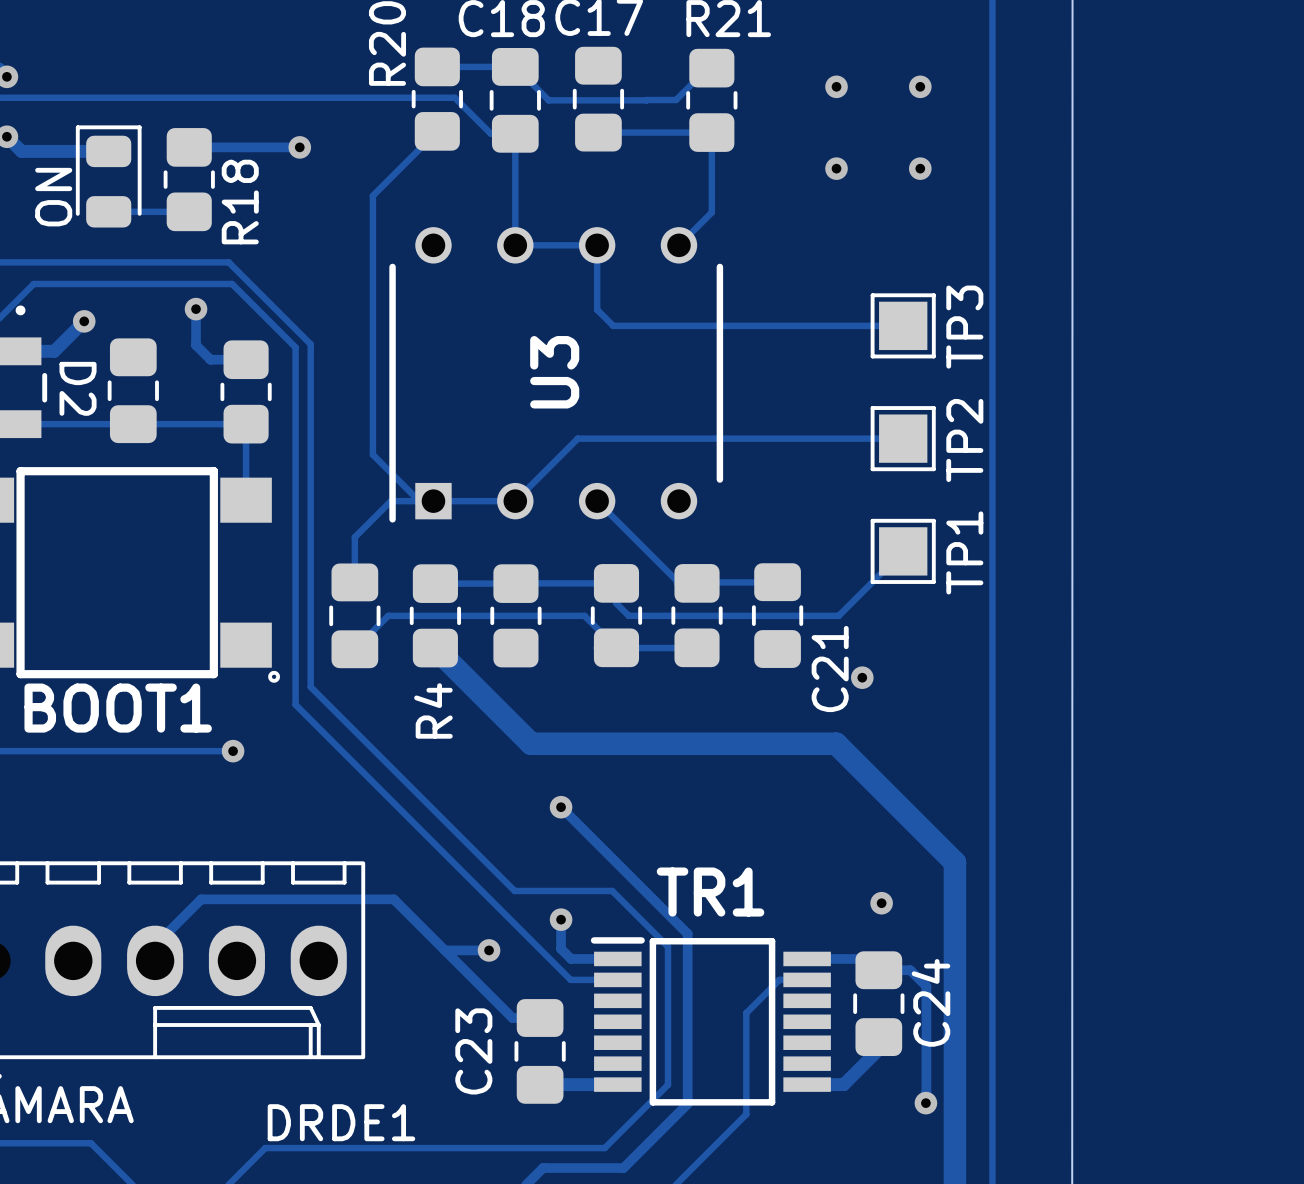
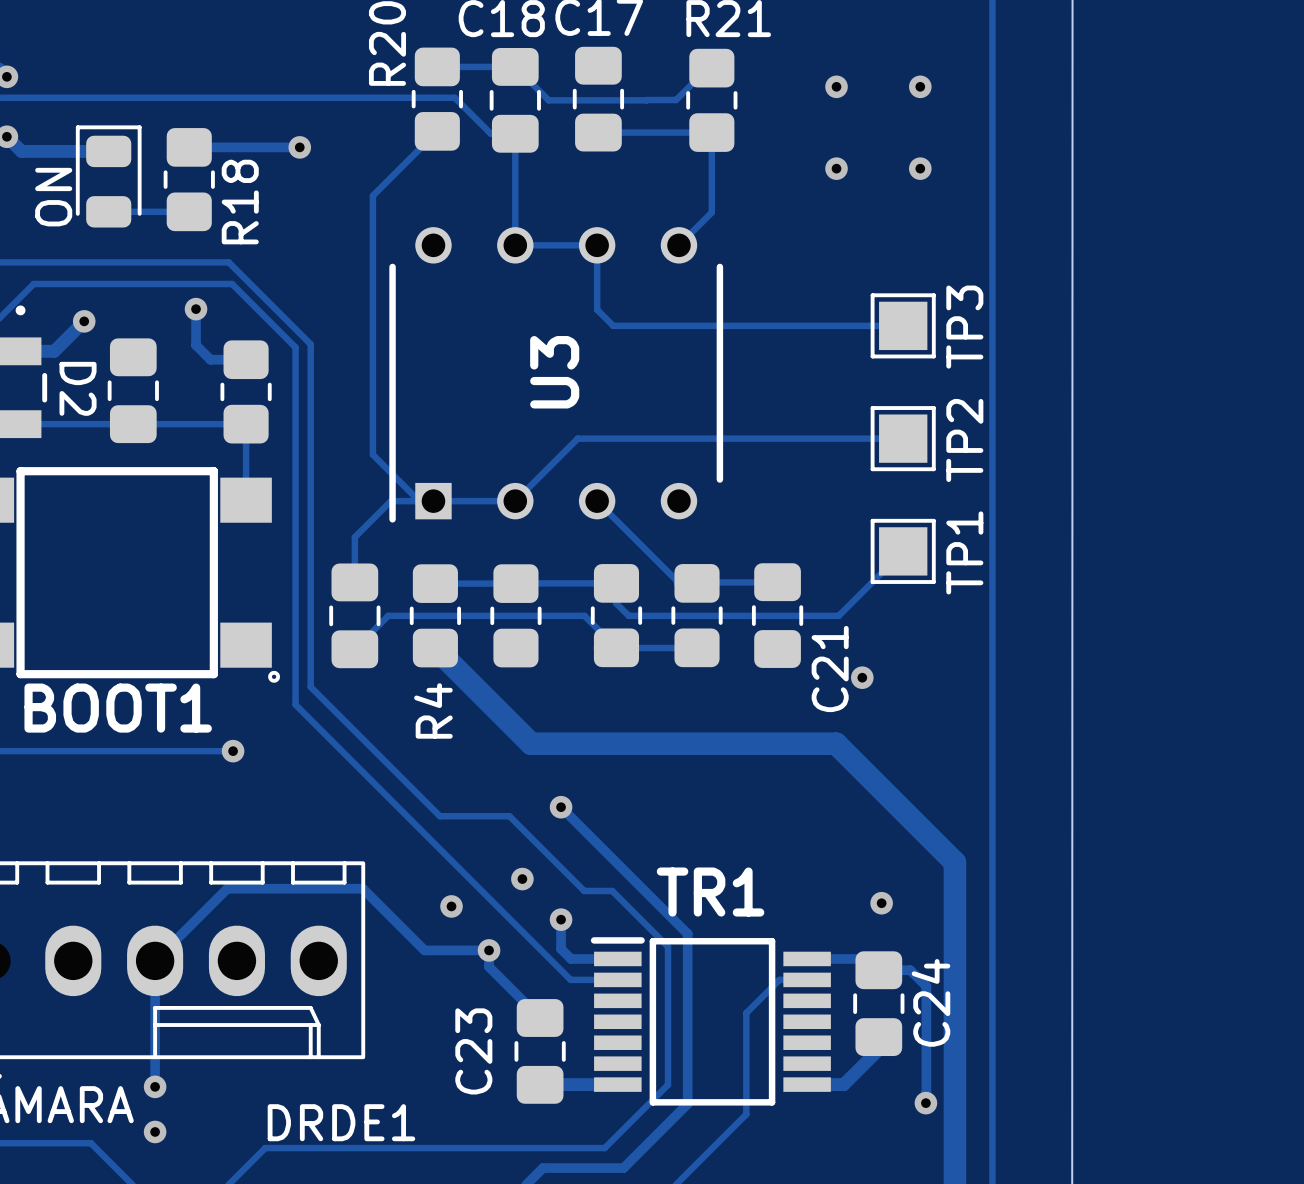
track: (439, 816) (514, 890) (584, 890) -> (439, 816) (509, 816) (584, 890)
via: none -> (522, 879)
via: none -> (451, 906)
track: none -> (444, 950) (424, 950) (362, 888) (227, 888) (155, 960) (155, 1086)
track: (155, 960) (155, 945) (201, 899) (393, 899) (512, 1018) (540, 1018) -> (489, 950) (489, 966) (540, 1018)
via: none -> (155, 1086)
via: none -> (155, 1131)

